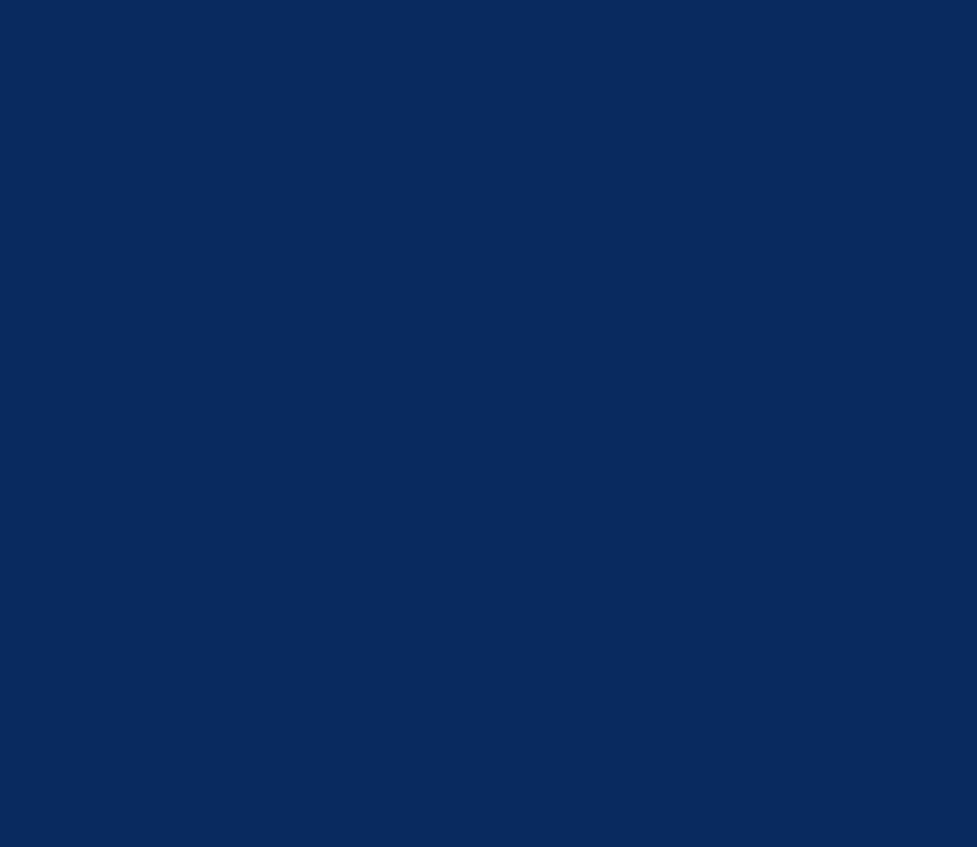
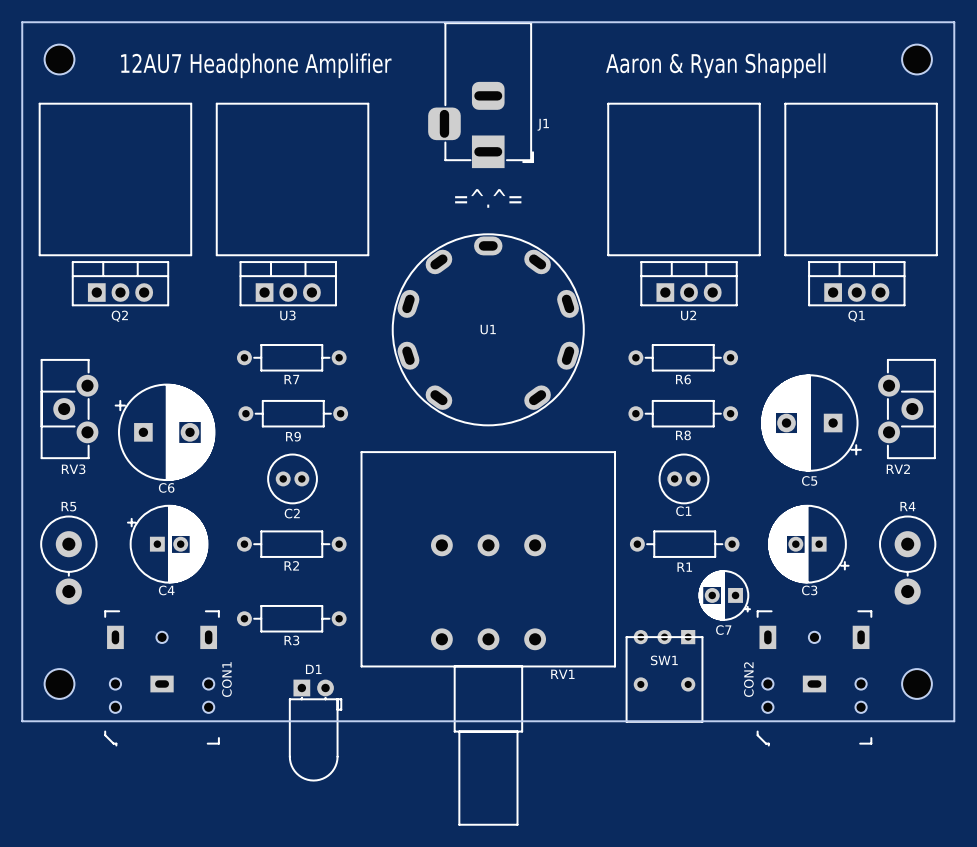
board edge: none -> (22, 22) (22, 721) (954, 721) (954, 22) (22, 22)
part: none -> (59, 59)
part: none -> (917, 59)
text: none -> 12AU7 Headphone Amplifier (256, 65)
text: none -> Aaron & Ryan Shappell (715, 65)
J1: none -> (480, 95)
drawing: none -> [39, 103, 192, 256]
drawing: none -> [216, 103, 369, 256]
drawing: none -> [607, 103, 761, 256]
drawing: none -> [784, 103, 938, 256]
text: none -> =^.^= (488, 198)
Q2: none -> (120, 283)
U3: none -> (288, 283)
U2: none -> (689, 283)
Q1: none -> (856, 283)
U1: none -> (488, 329)
R7: none -> (291, 357)
R6: none -> (683, 357)
RV3: none -> (69, 409)
RV2: none -> (906, 409)
R9: none -> (293, 413)
R8: none -> (683, 413)
C5: none -> (811, 423)
C6: none -> (165, 432)
C2: none -> (292, 478)
C1: none -> (683, 478)
C4: none -> (167, 544)
R2: none -> (291, 544)
R1: none -> (684, 544)
C3: none -> (808, 544)
R5: none -> (68, 560)
R4: none -> (907, 560)
C7: none -> (724, 595)
R3: none -> (291, 618)
RV1: none -> (488, 638)
SW1: none -> (664, 676)
CON1: none -> (162, 678)
CON2: none -> (814, 678)
part: none -> (59, 683)
part: none -> (917, 683)
D1: none -> (315, 730)

